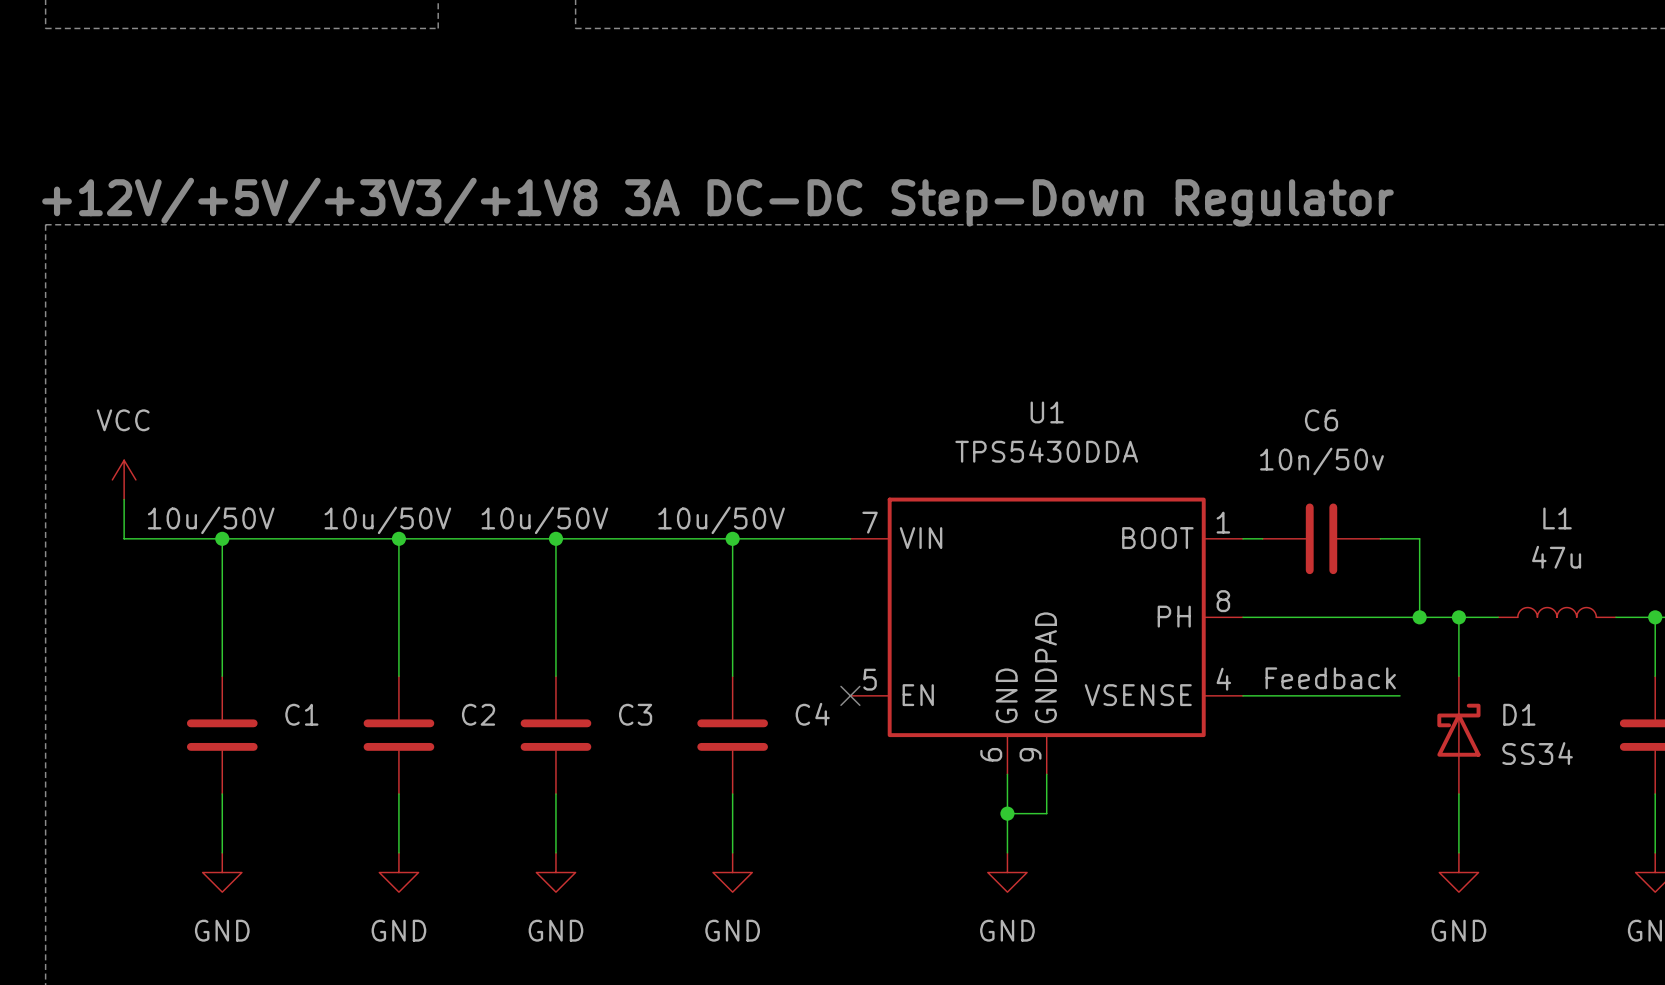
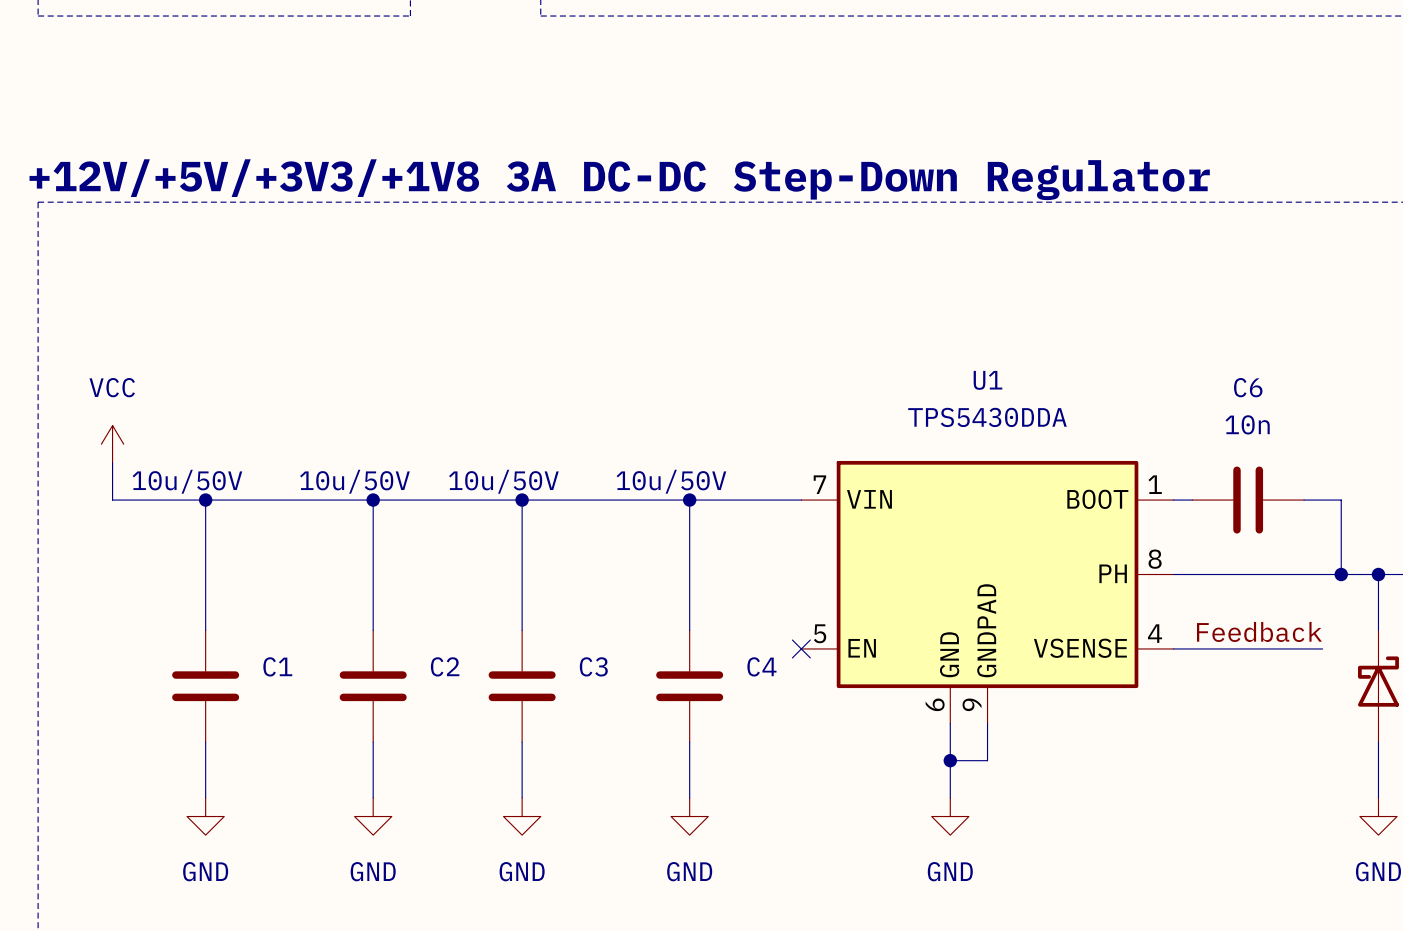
C6 value: 10n/50v (1321, 461) -> 10n (1247, 424)

